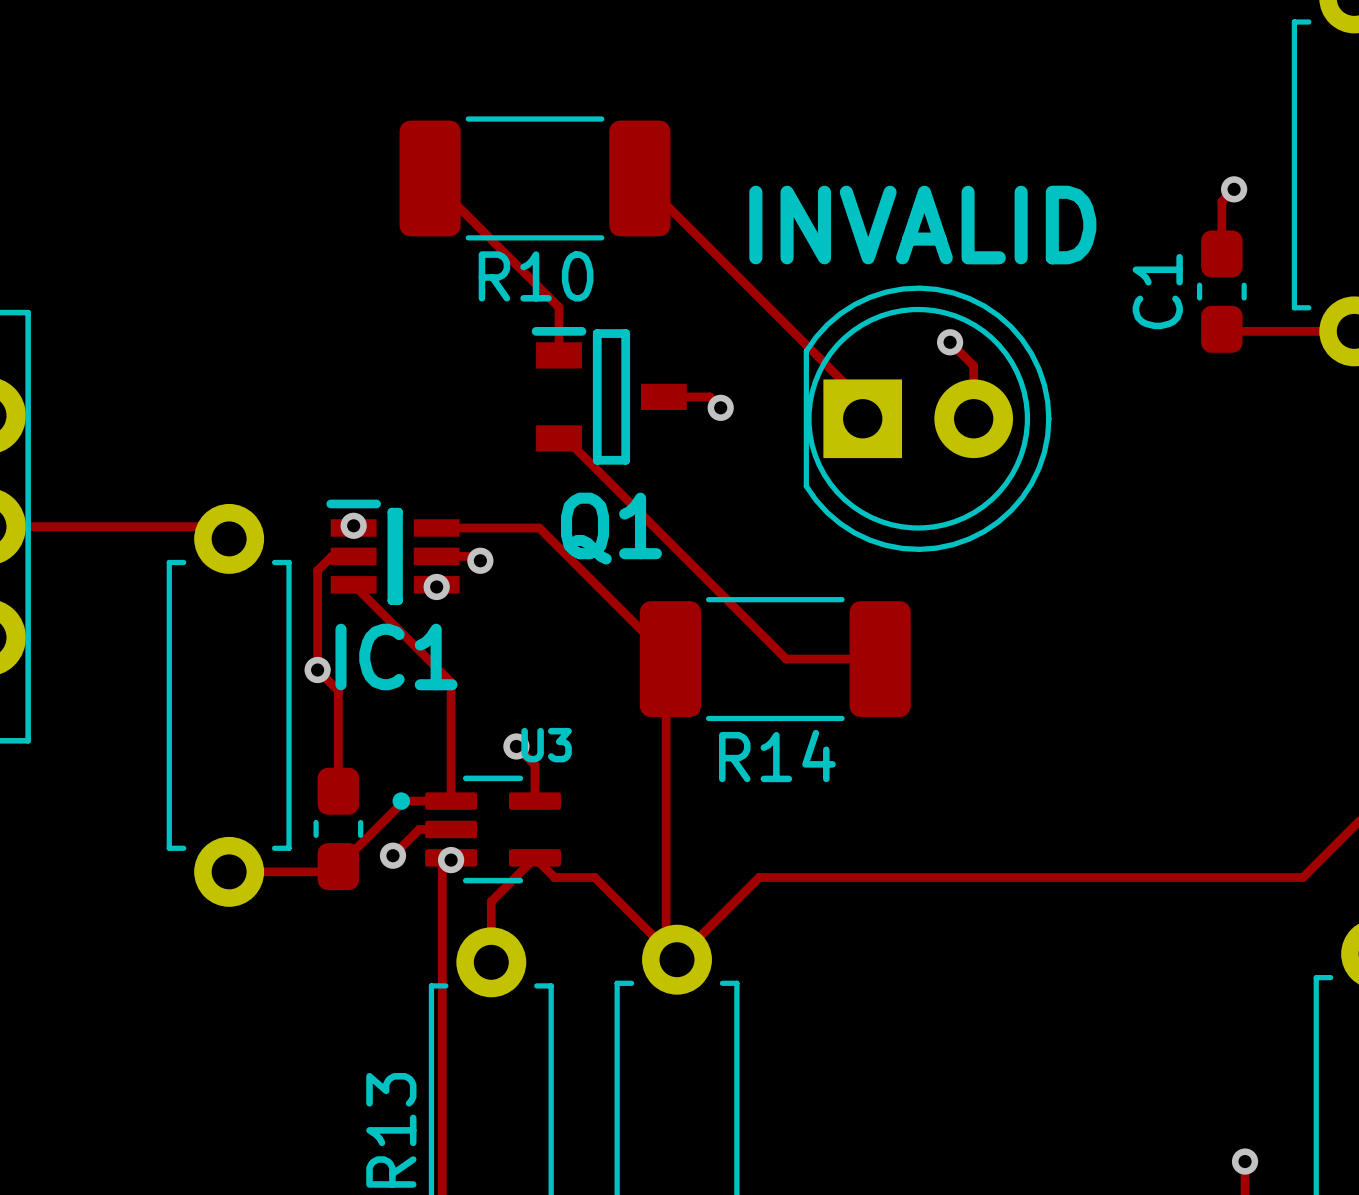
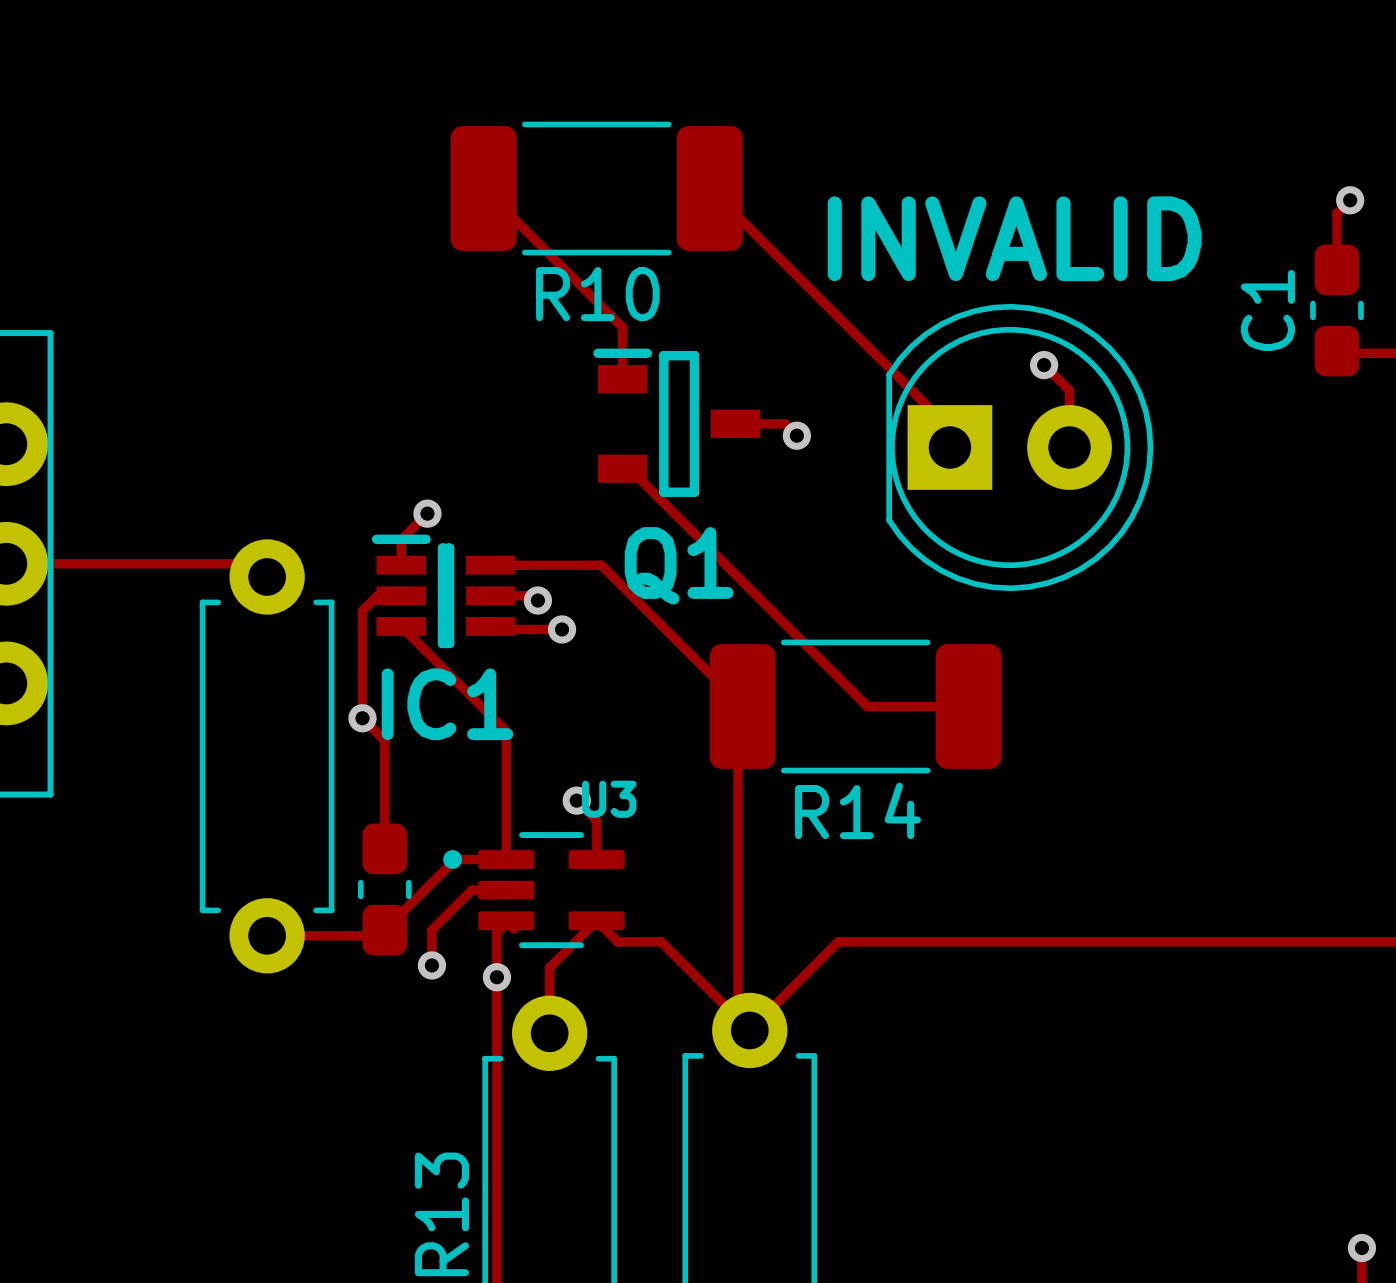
track: none -> (427, 513) (401, 539) (401, 565)
via position: (353, 525) -> (427, 513)
track: none -> (490, 626) (493, 629) (562, 629)
via: (436, 586) -> none
via: none -> (562, 629)
track: none -> (443, 918) (431, 930) (431, 965)
via: (392, 855) -> none
via: (451, 860) -> none
via: none -> (431, 965)
via: none -> (496, 977)

